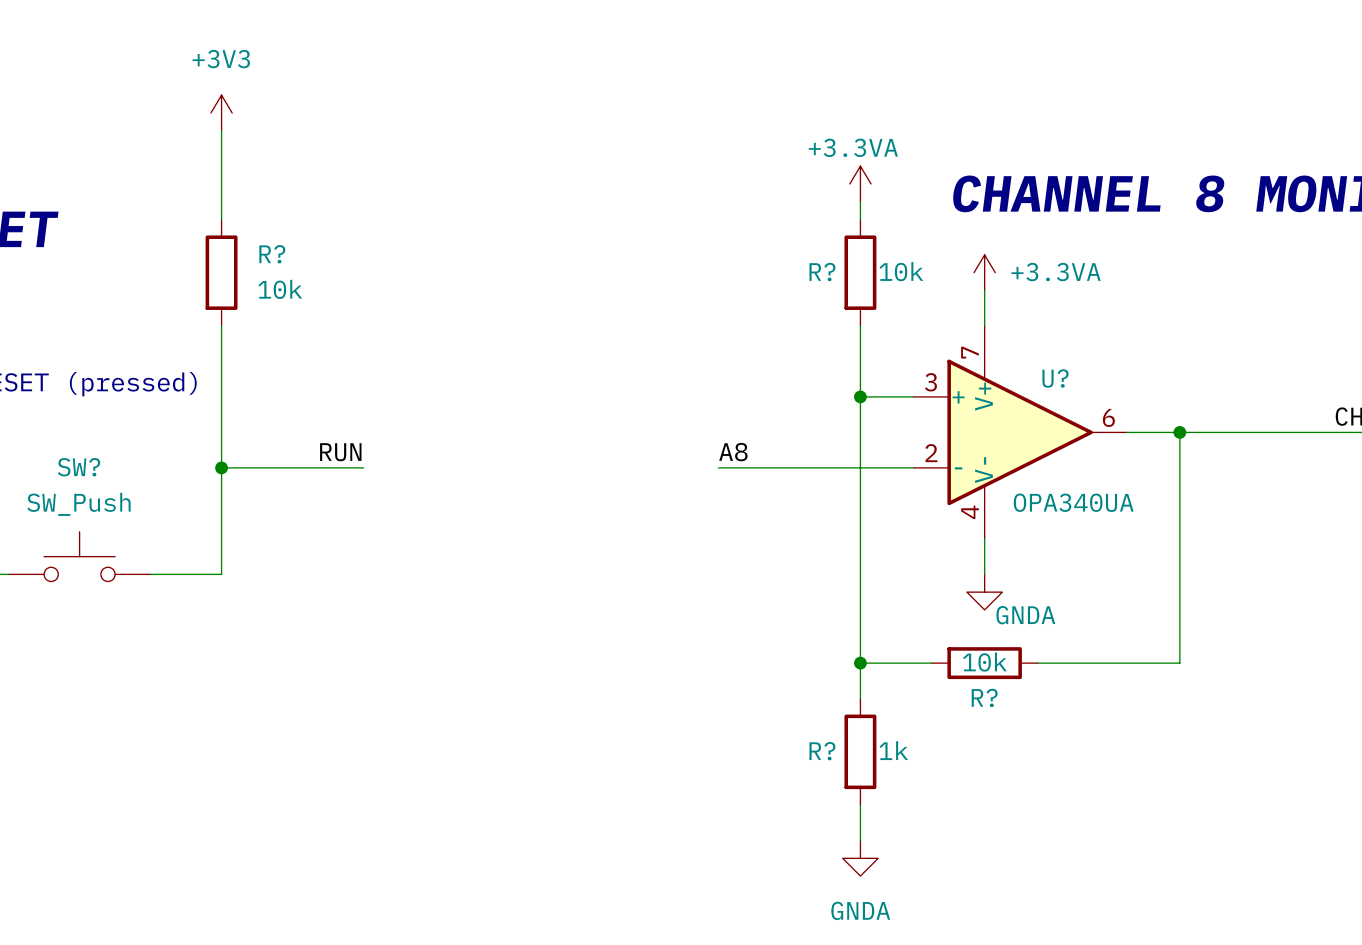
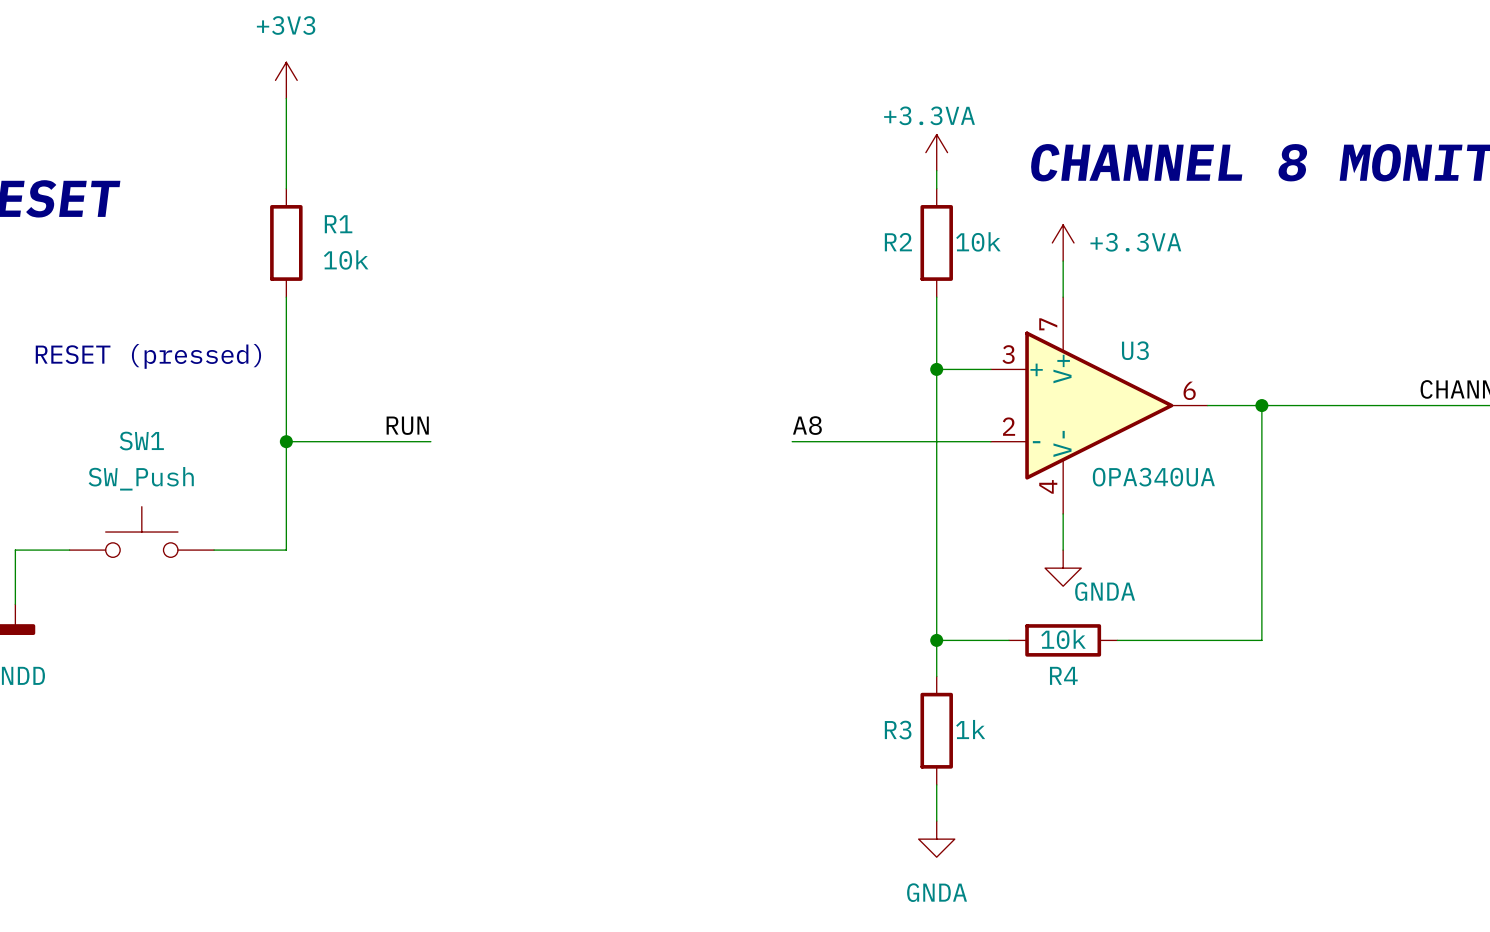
R? name: R? (272, 254) -> R1 (338, 224)
R? name: R? (822, 272) -> R2 (898, 242)
U? name: U? (1055, 378) -> U3 (1135, 350)
SW? name: SW? (79, 467) -> SW1 (141, 441)
R? name: R? (984, 697) -> R4 (1063, 675)
R? name: R? (822, 751) -> R3 (898, 730)

